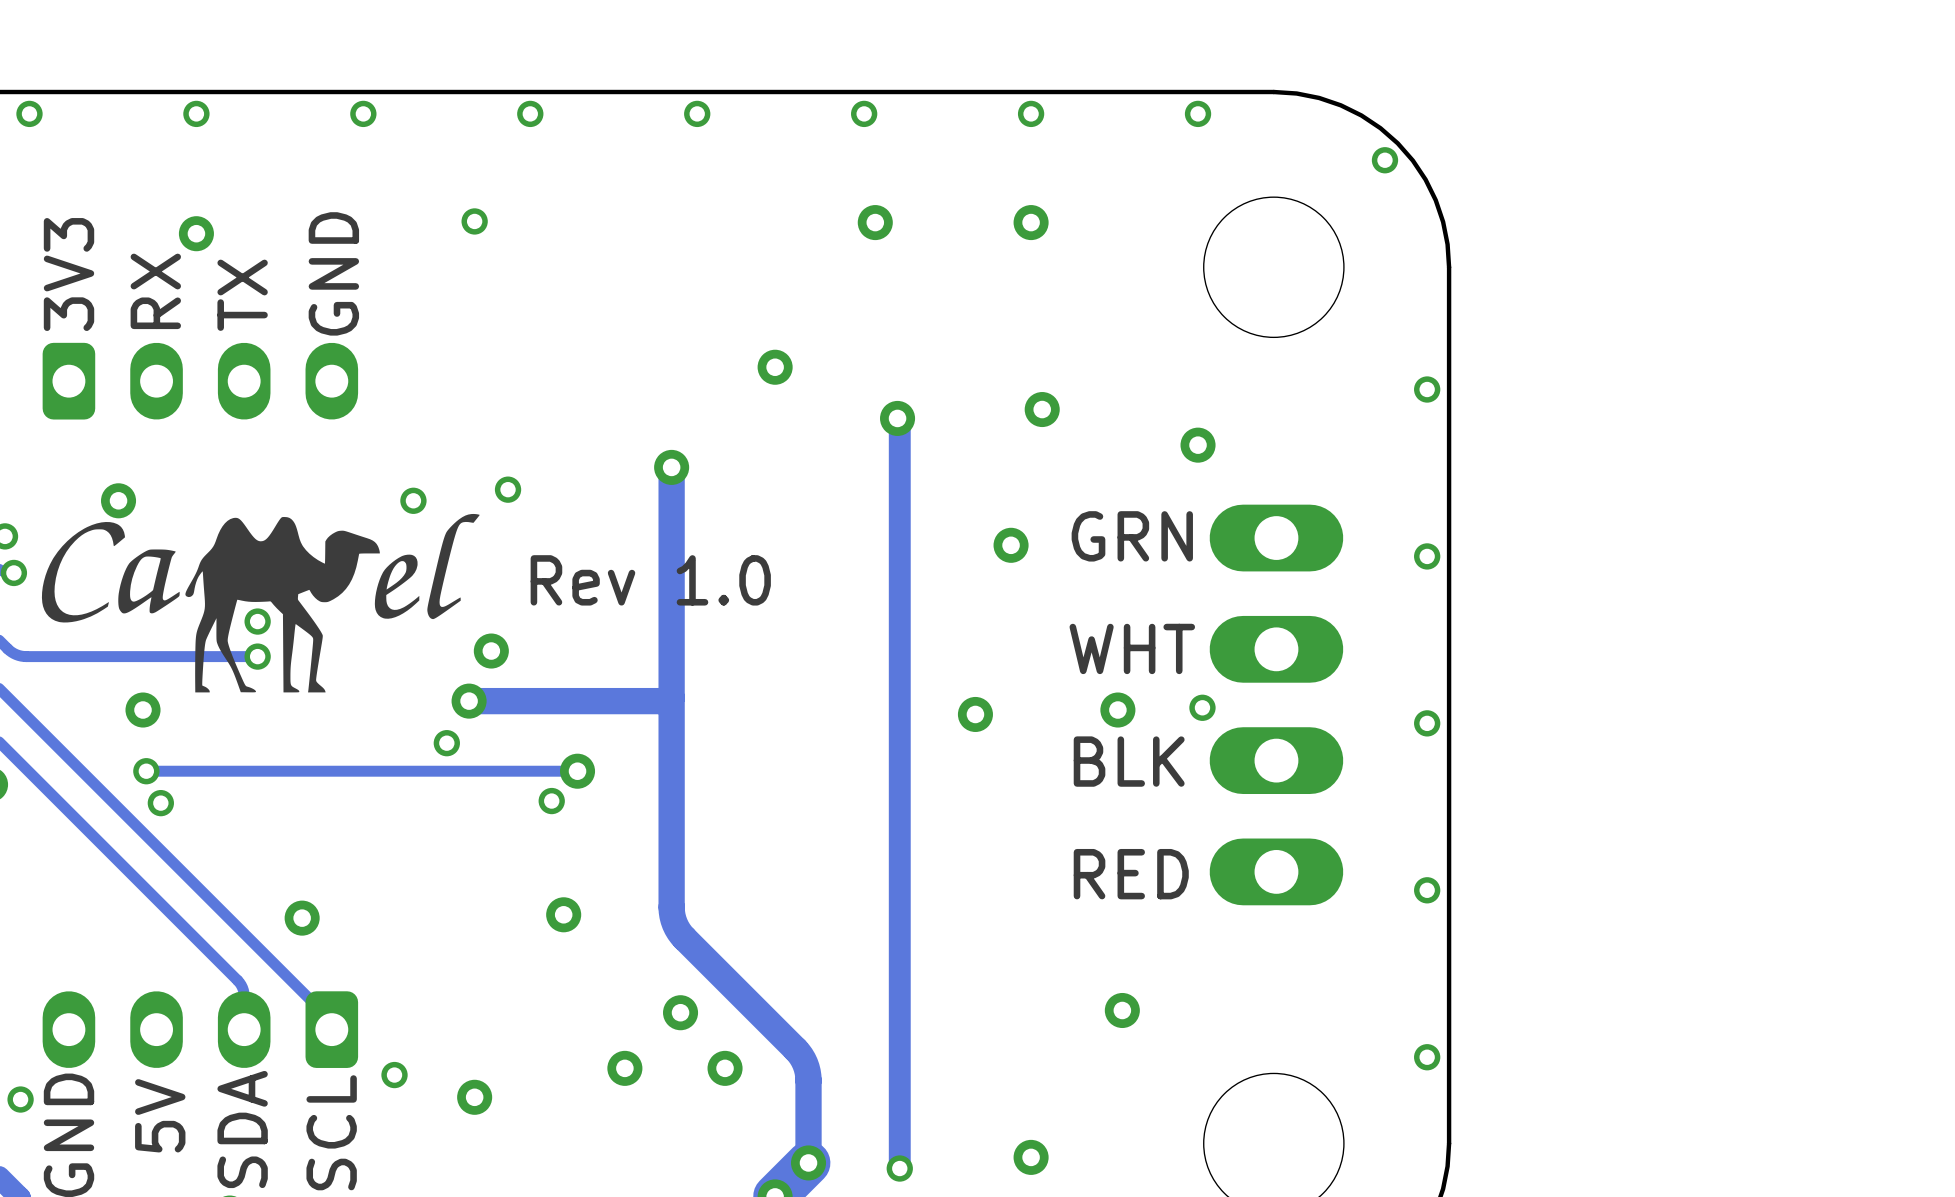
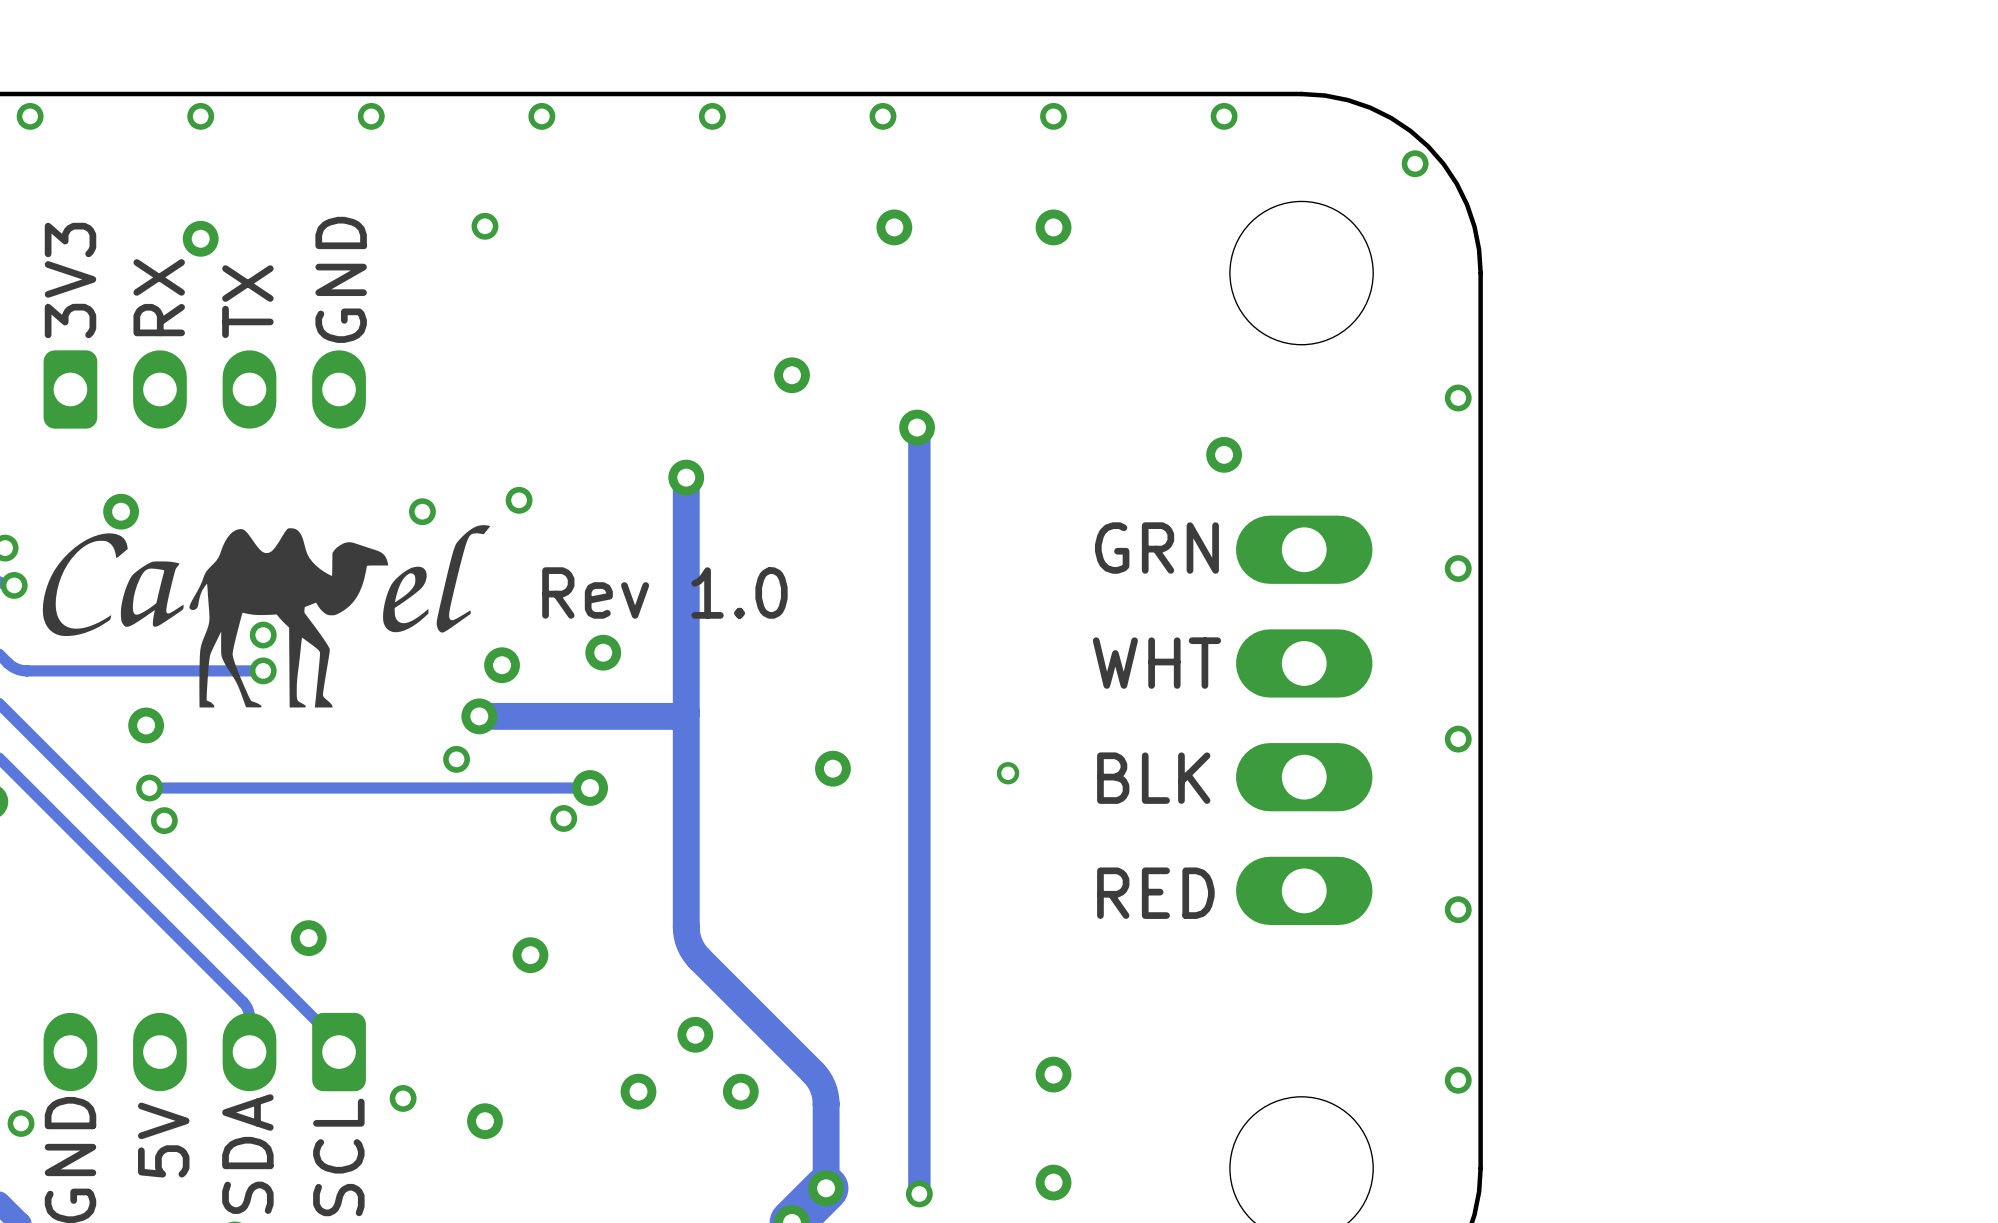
via: (1042, 409) -> none
via: (1011, 545) -> none
via: none -> (603, 652)
via: (1202, 707) -> none
via: (1117, 710) -> none
via: (975, 714) -> none
via: none -> (832, 768)
via: none -> (1008, 773)
via position: (563, 914) -> (530, 955)
via position: (1122, 1010) -> (1053, 1074)

